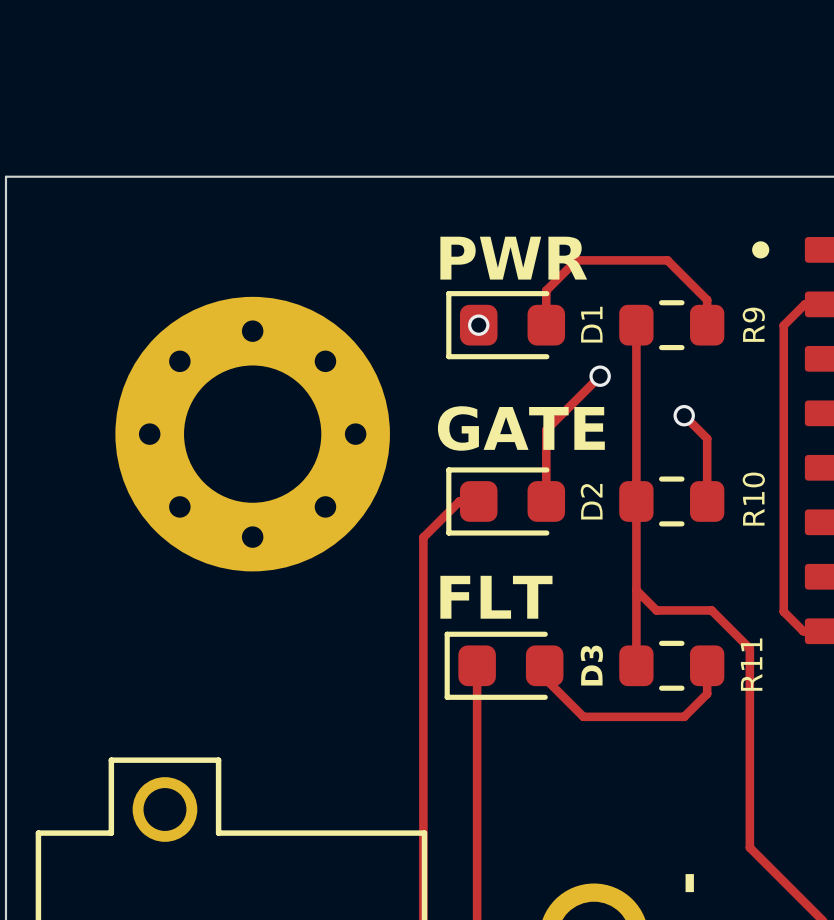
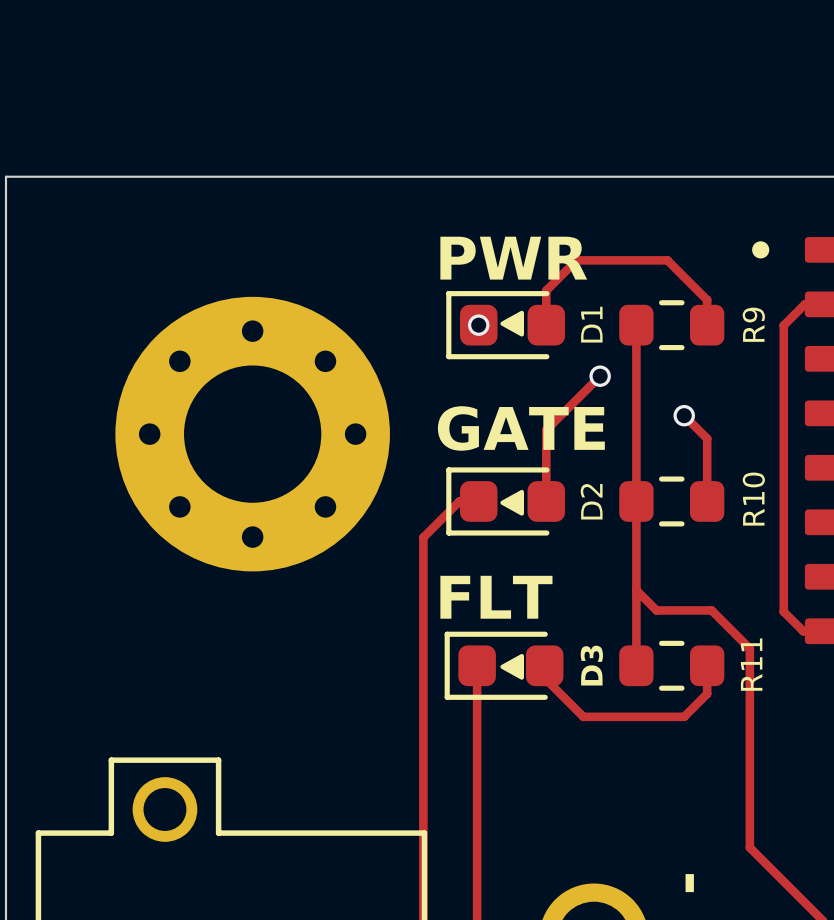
drawing: none -> [500, 310, 525, 337]
drawing: none -> [500, 489, 525, 516]
drawing: none -> [500, 653, 525, 680]

